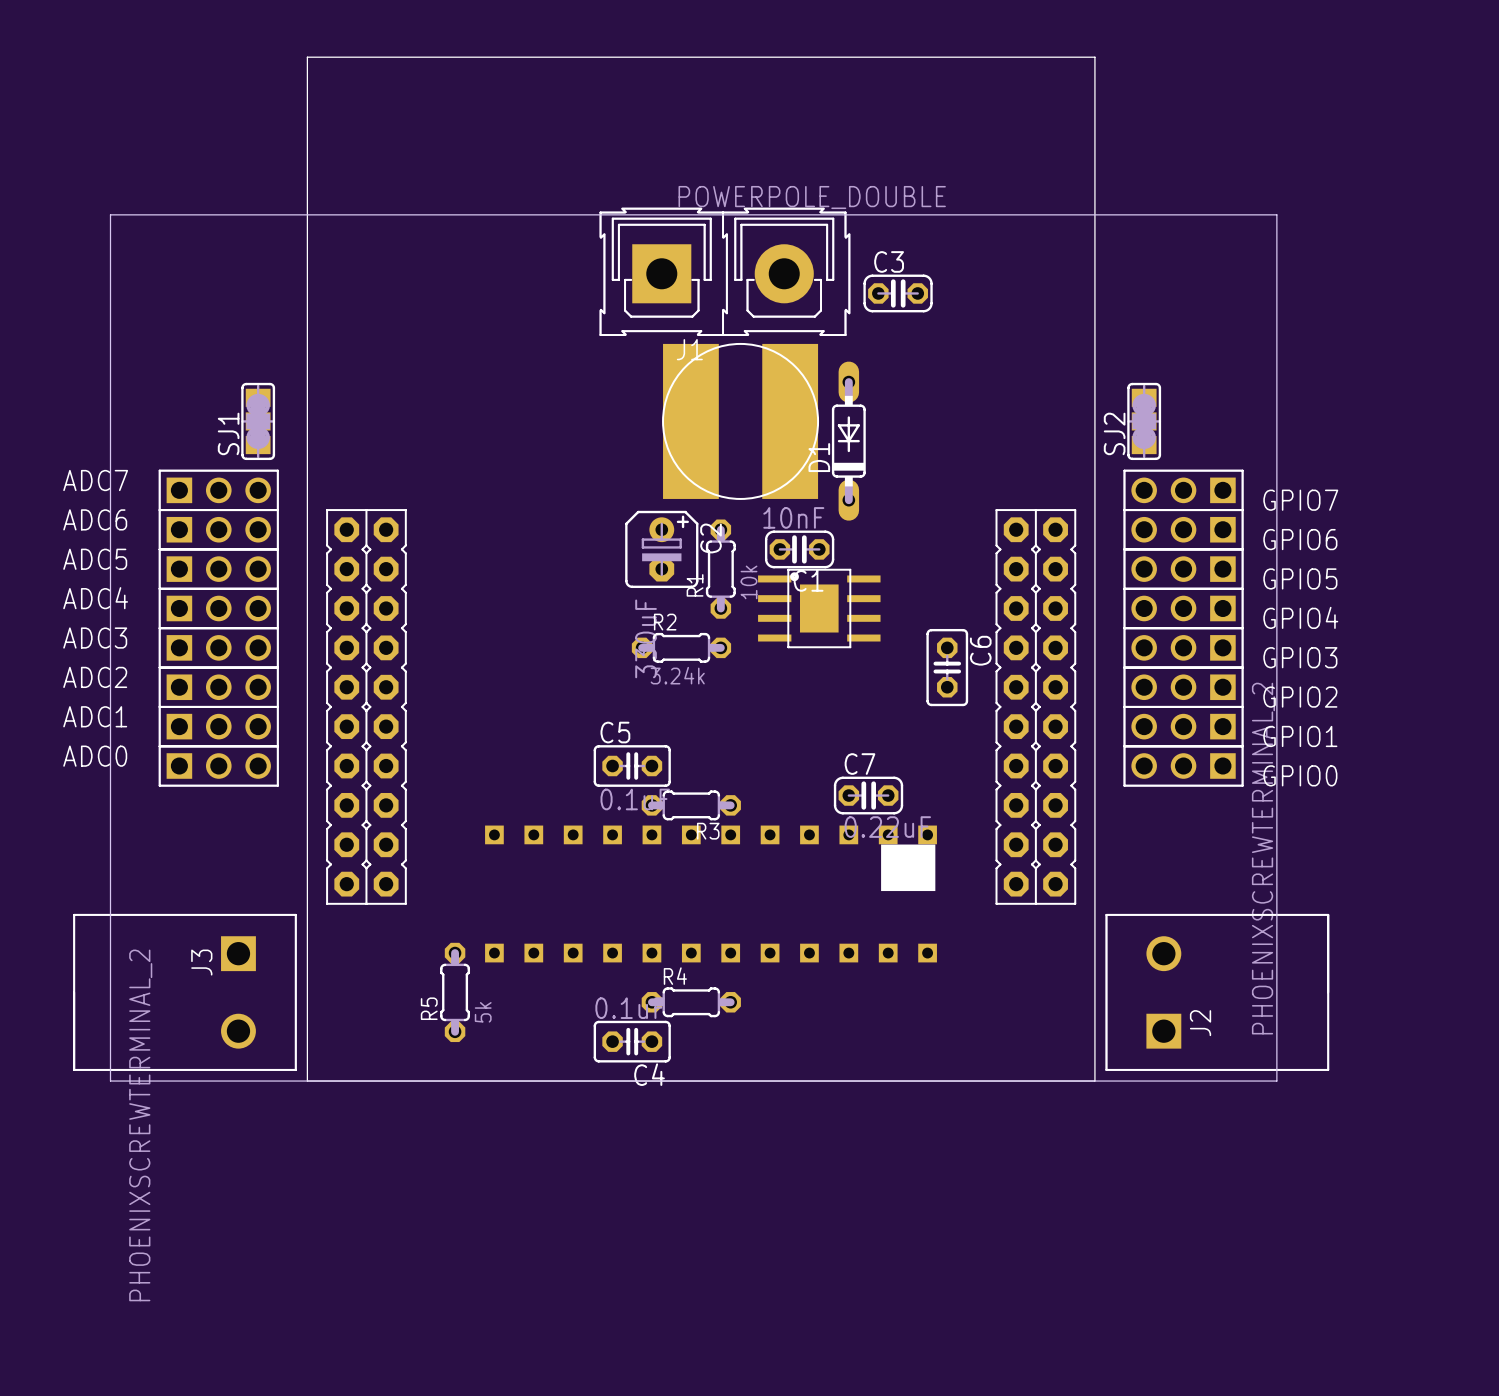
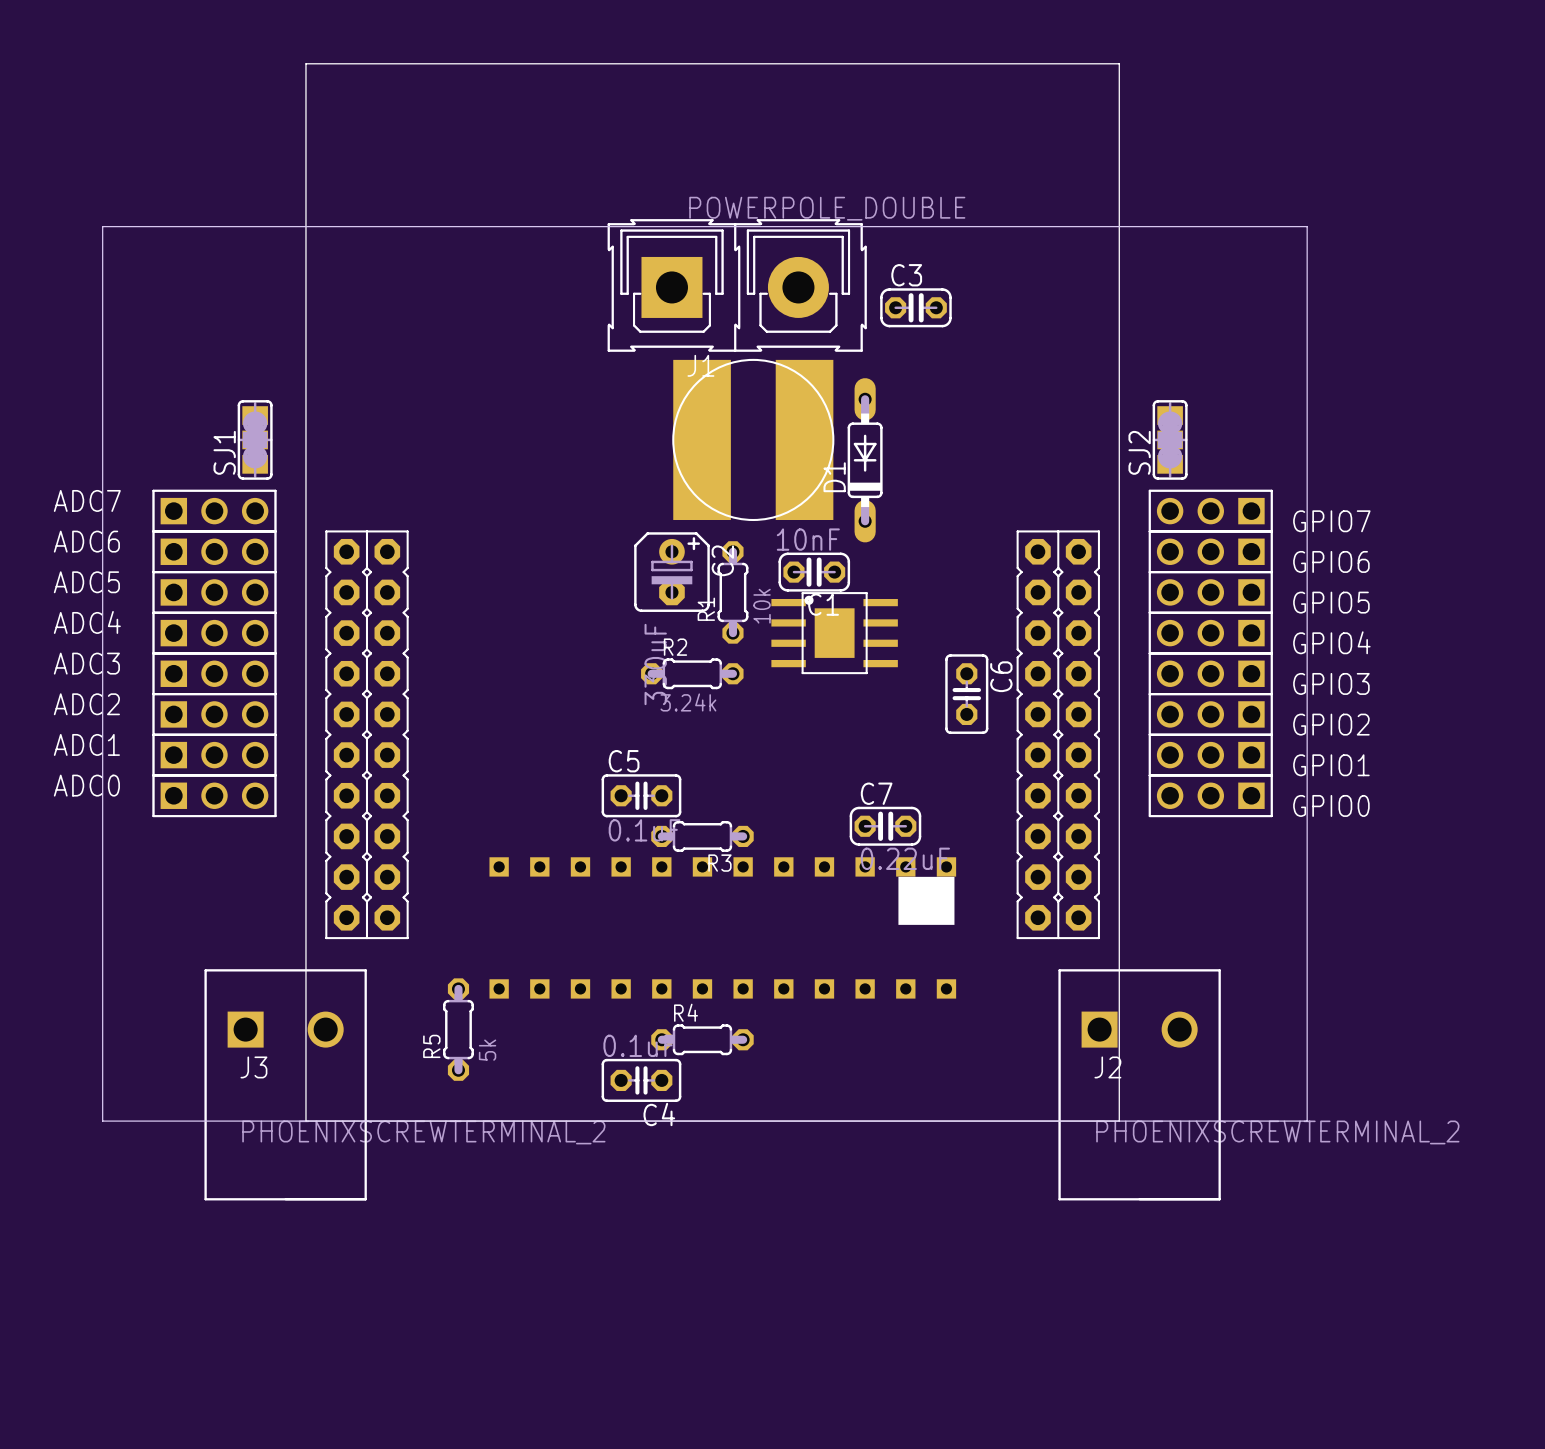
J3 rotation: 0° (184, 992) -> 90° counterclockwise (285, 1084)
J2 rotation: 0° (1217, 992) -> 90° clockwise (1139, 1084)

